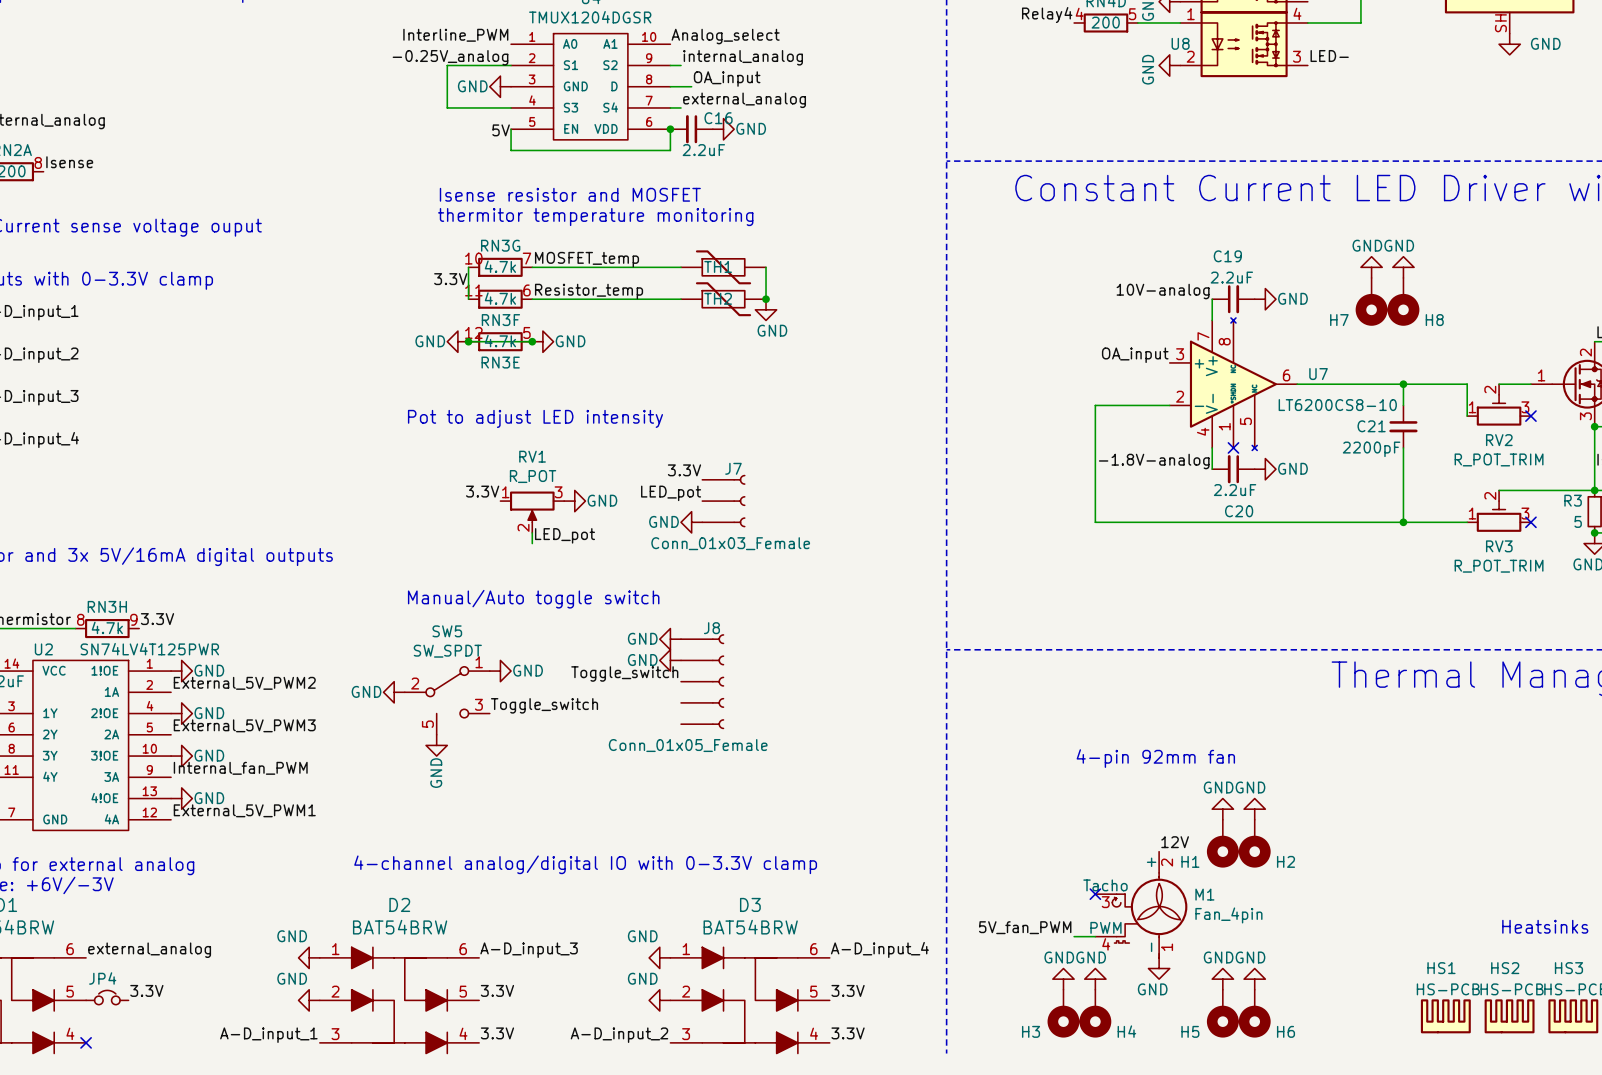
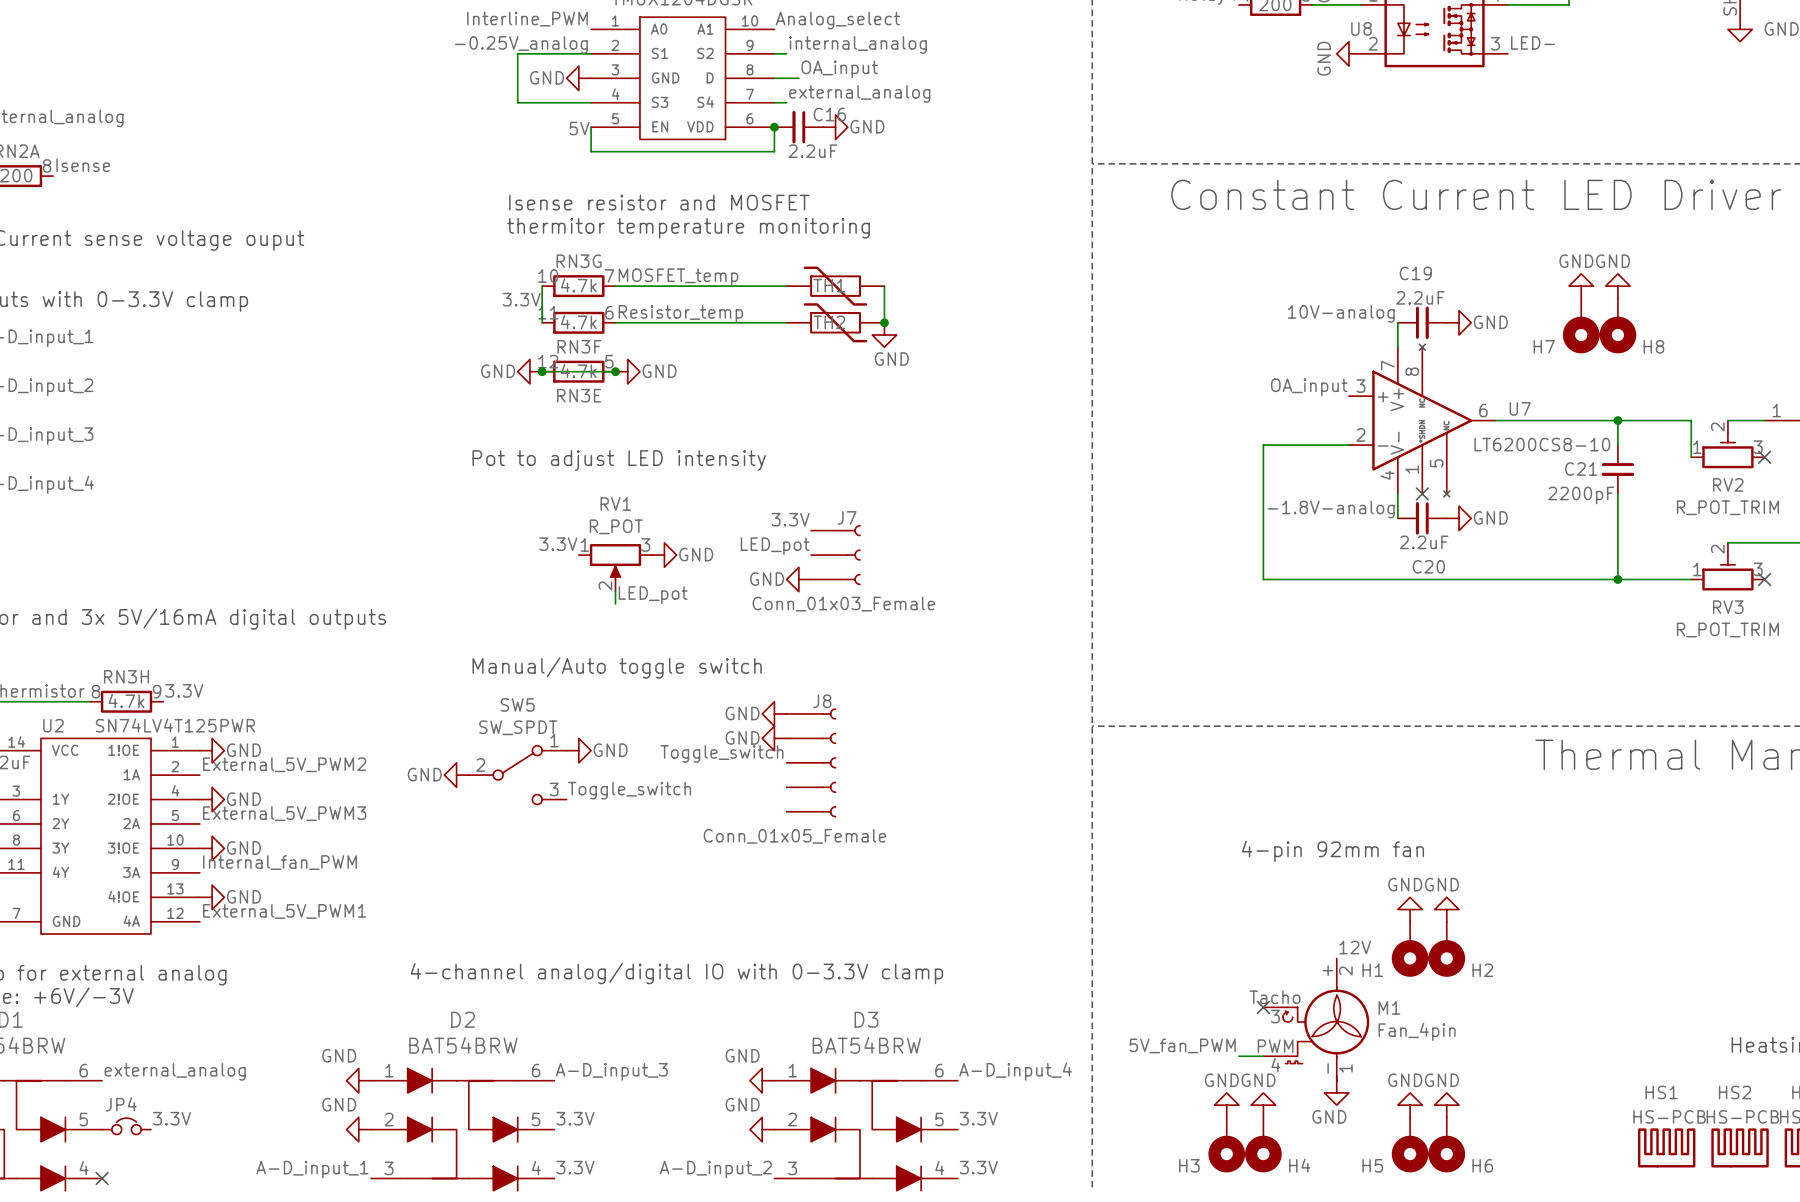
SW5 symbol: [404, 666, 490, 735] -> [468, 745, 567, 805]
power symbol: GND (436, 745) -> none

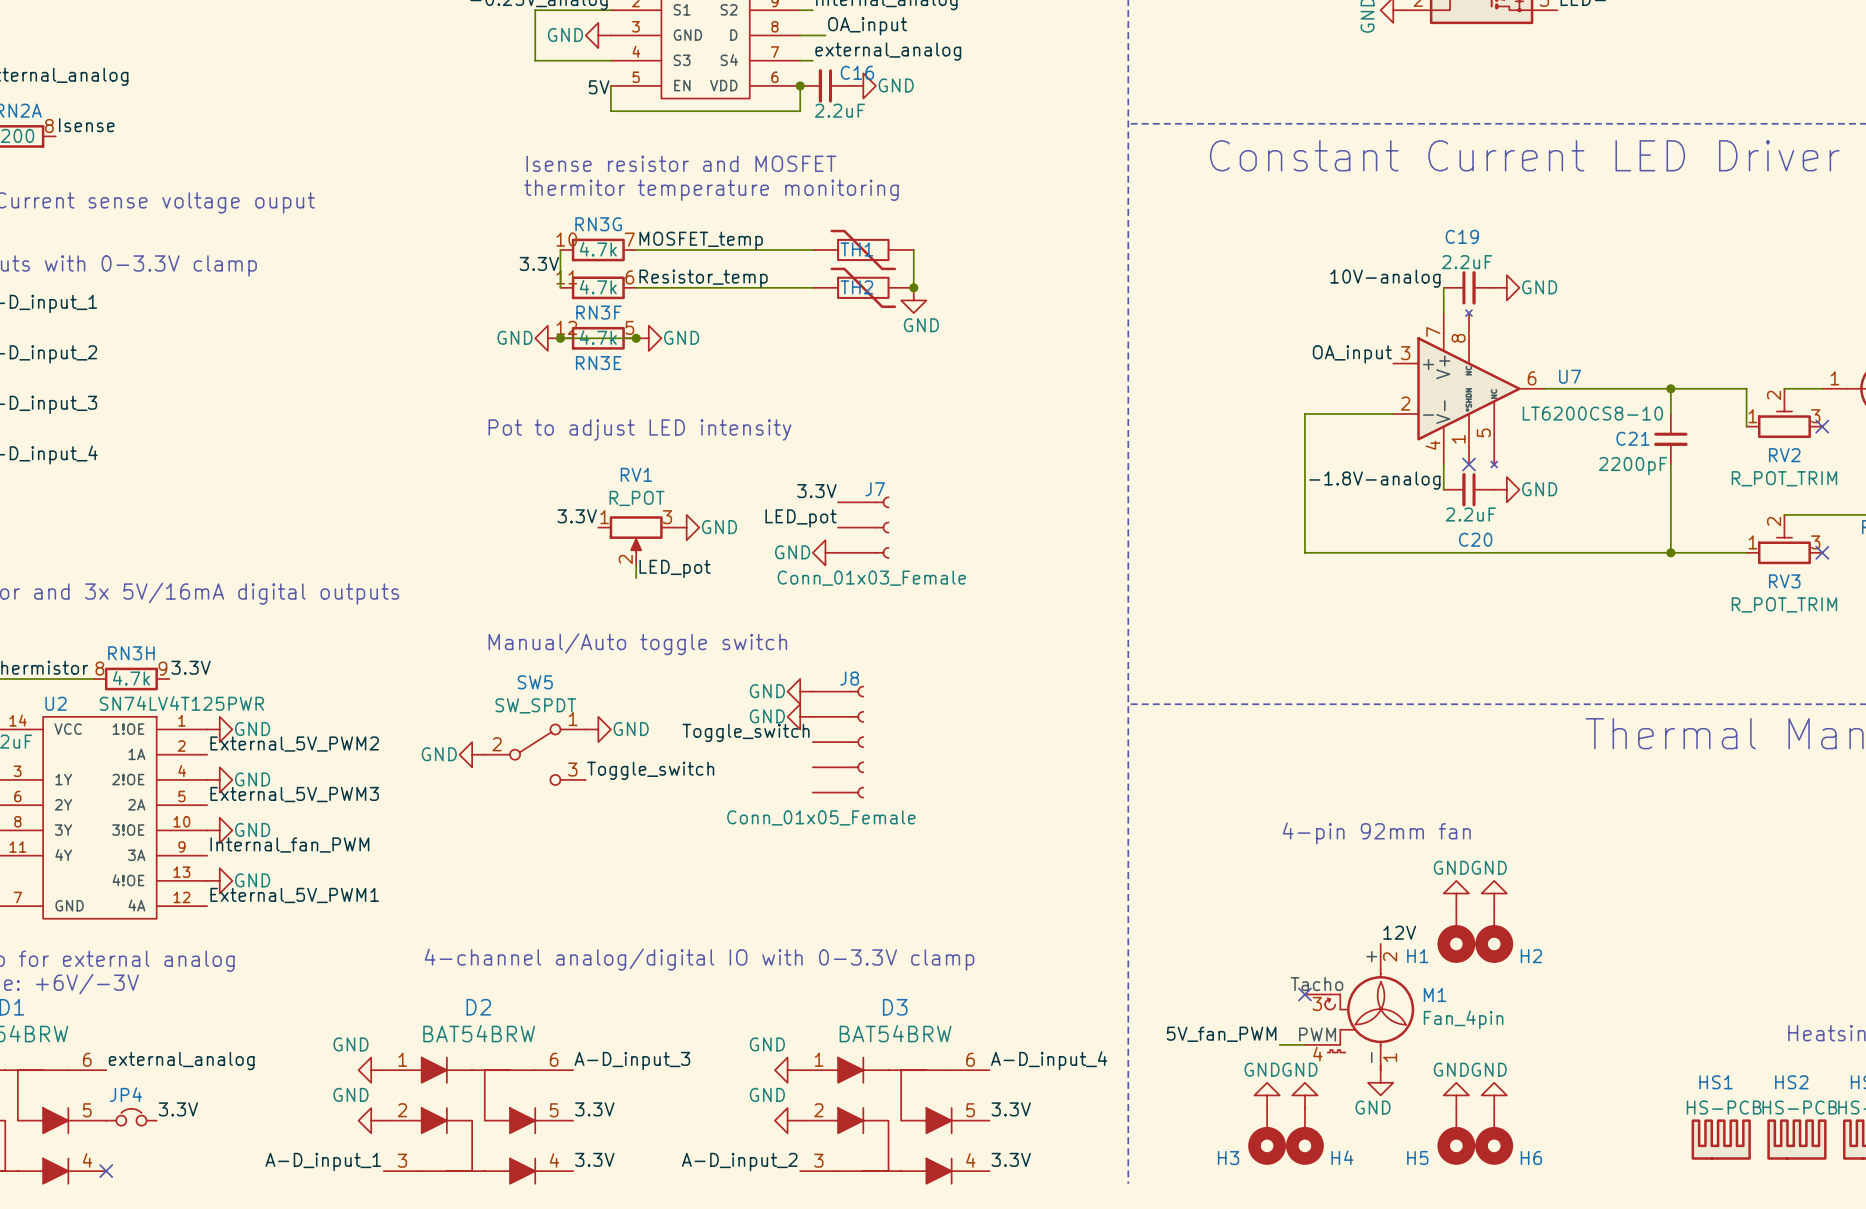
power symbol: GND (1581, 286) -> none
power symbol: GND (1617, 286) -> none
H7: (1581, 325) -> none
H8: (1617, 325) -> none

